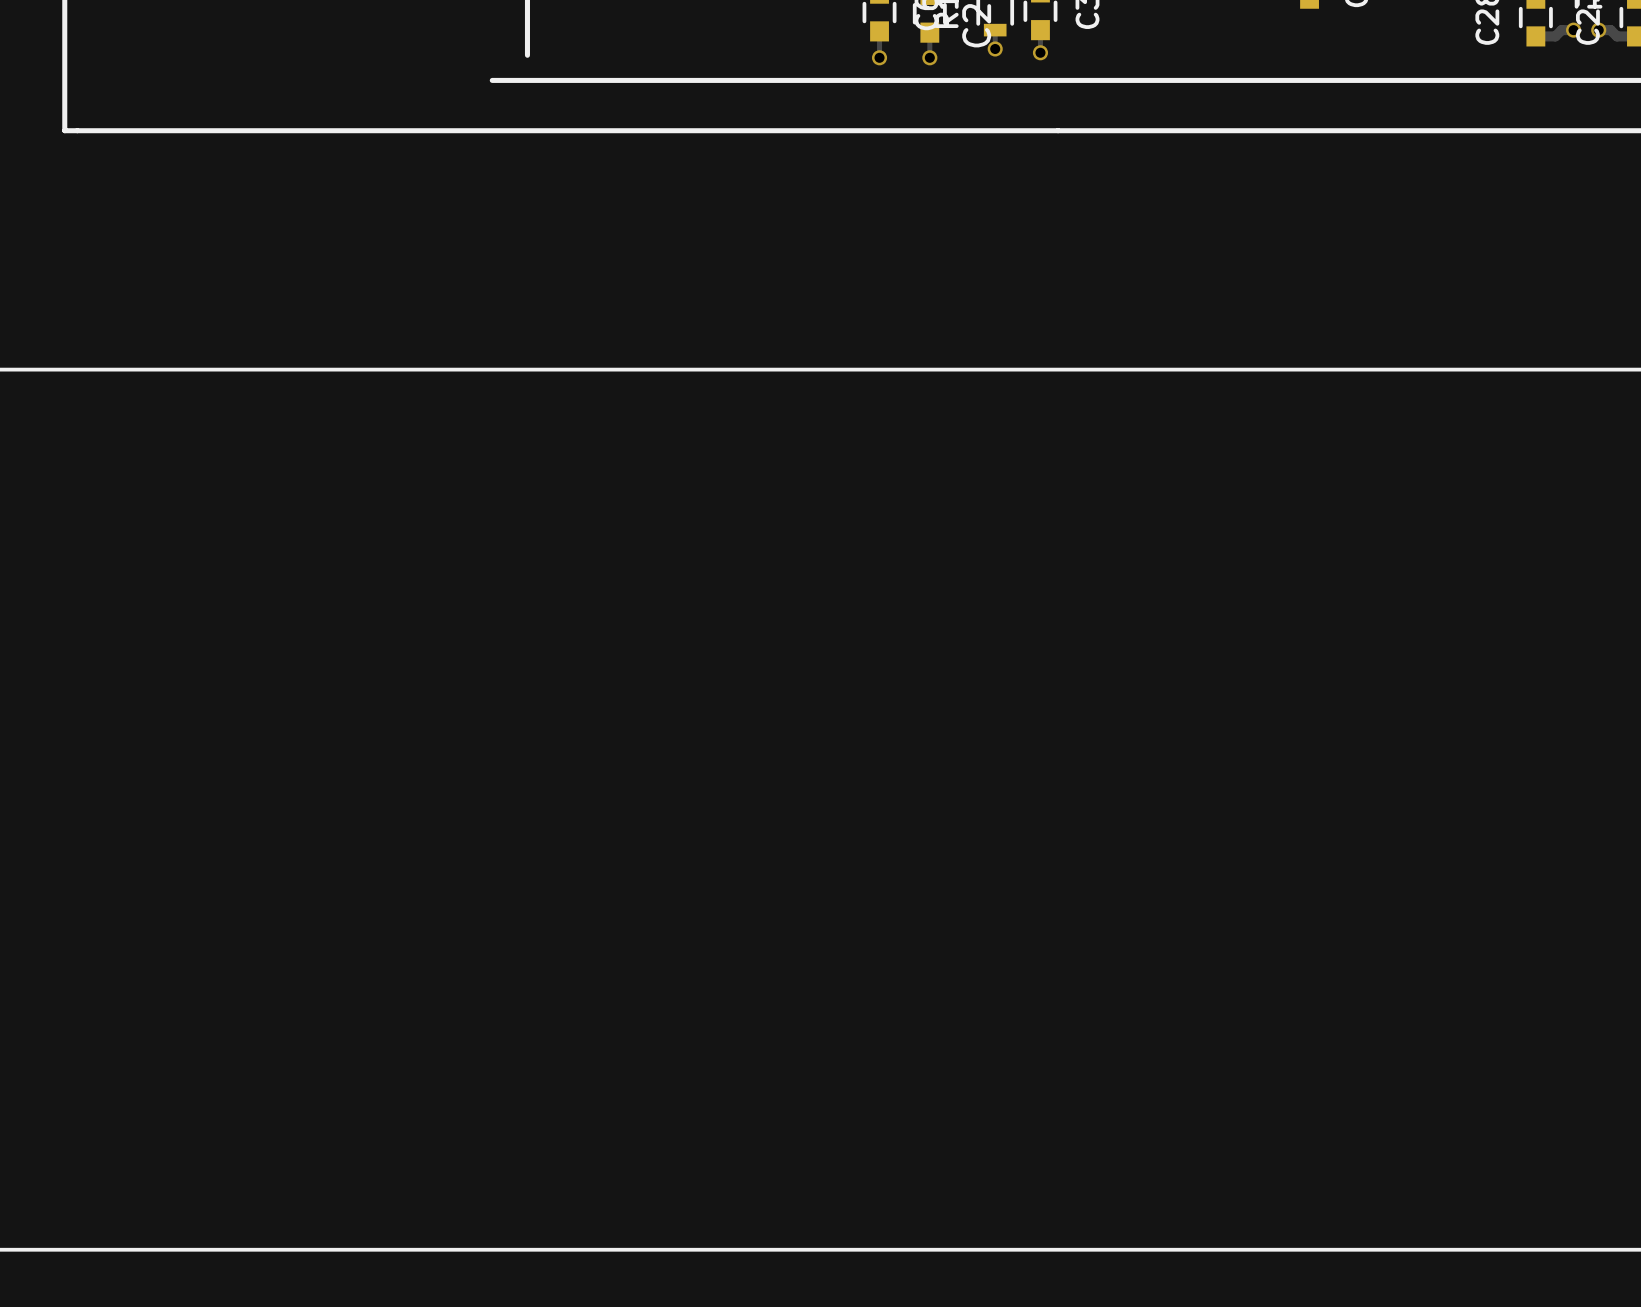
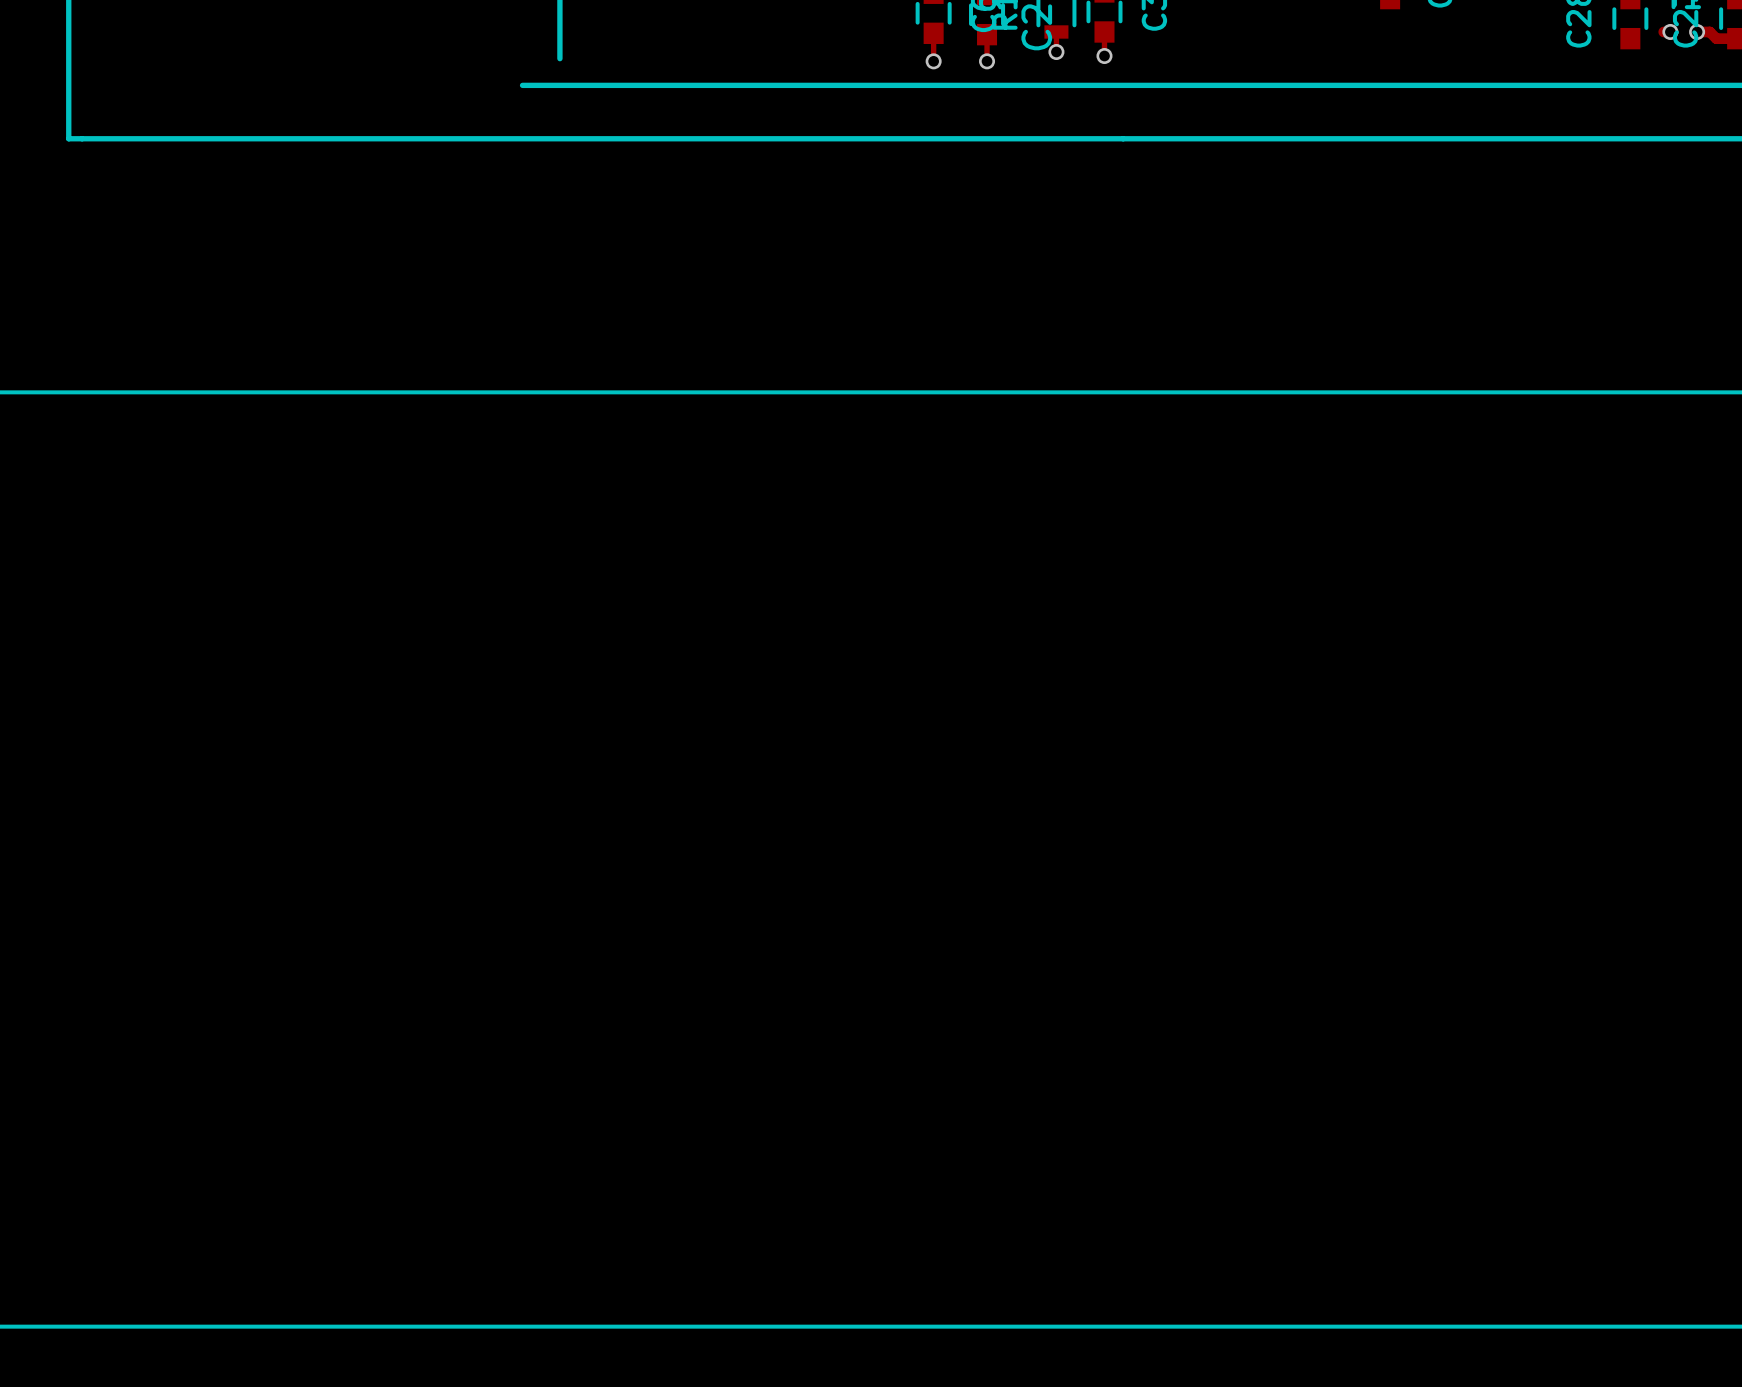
track: (1567, 30) (1561, 30) (1555, 36) (1535, 36) -> none

